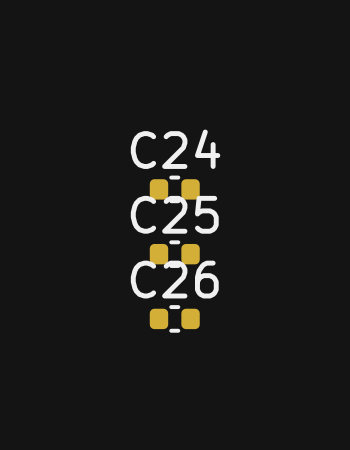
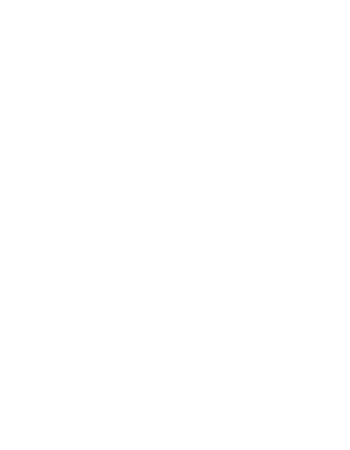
C24: (174, 189) -> none
C25: (174, 254) -> none
C26: (174, 318) -> none

